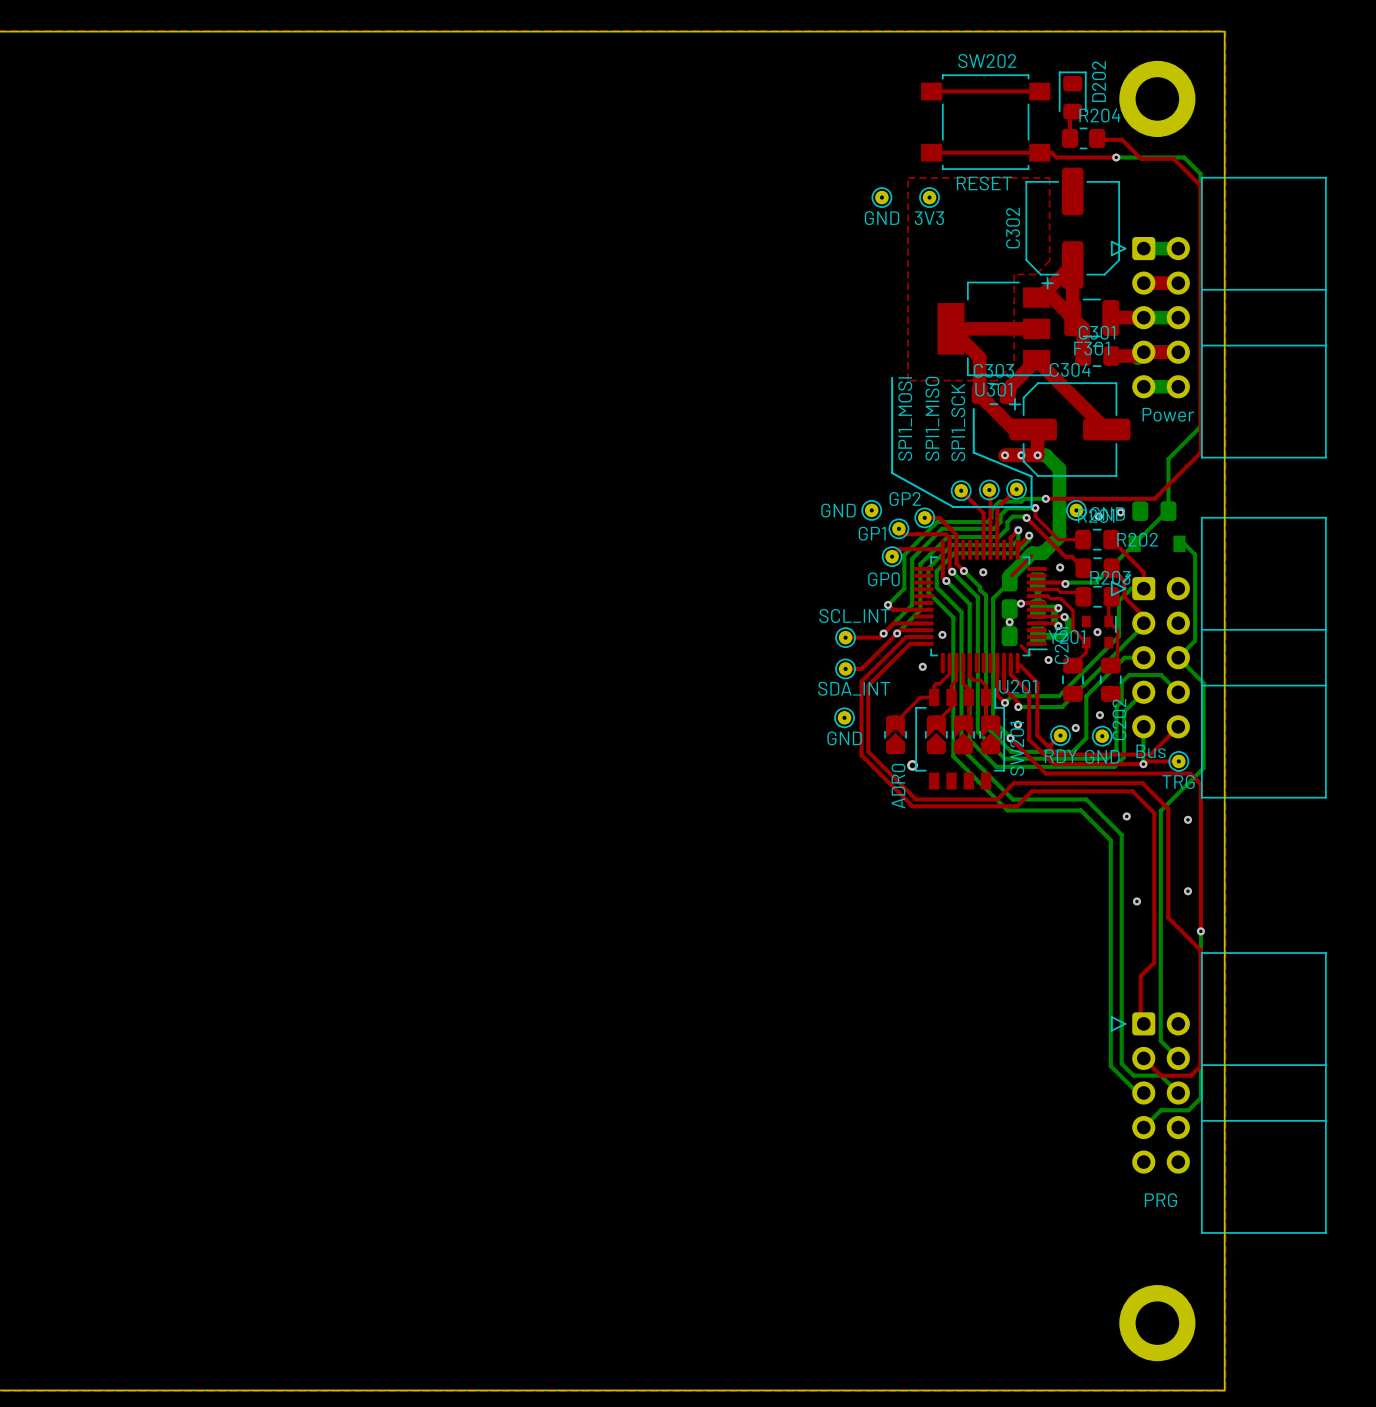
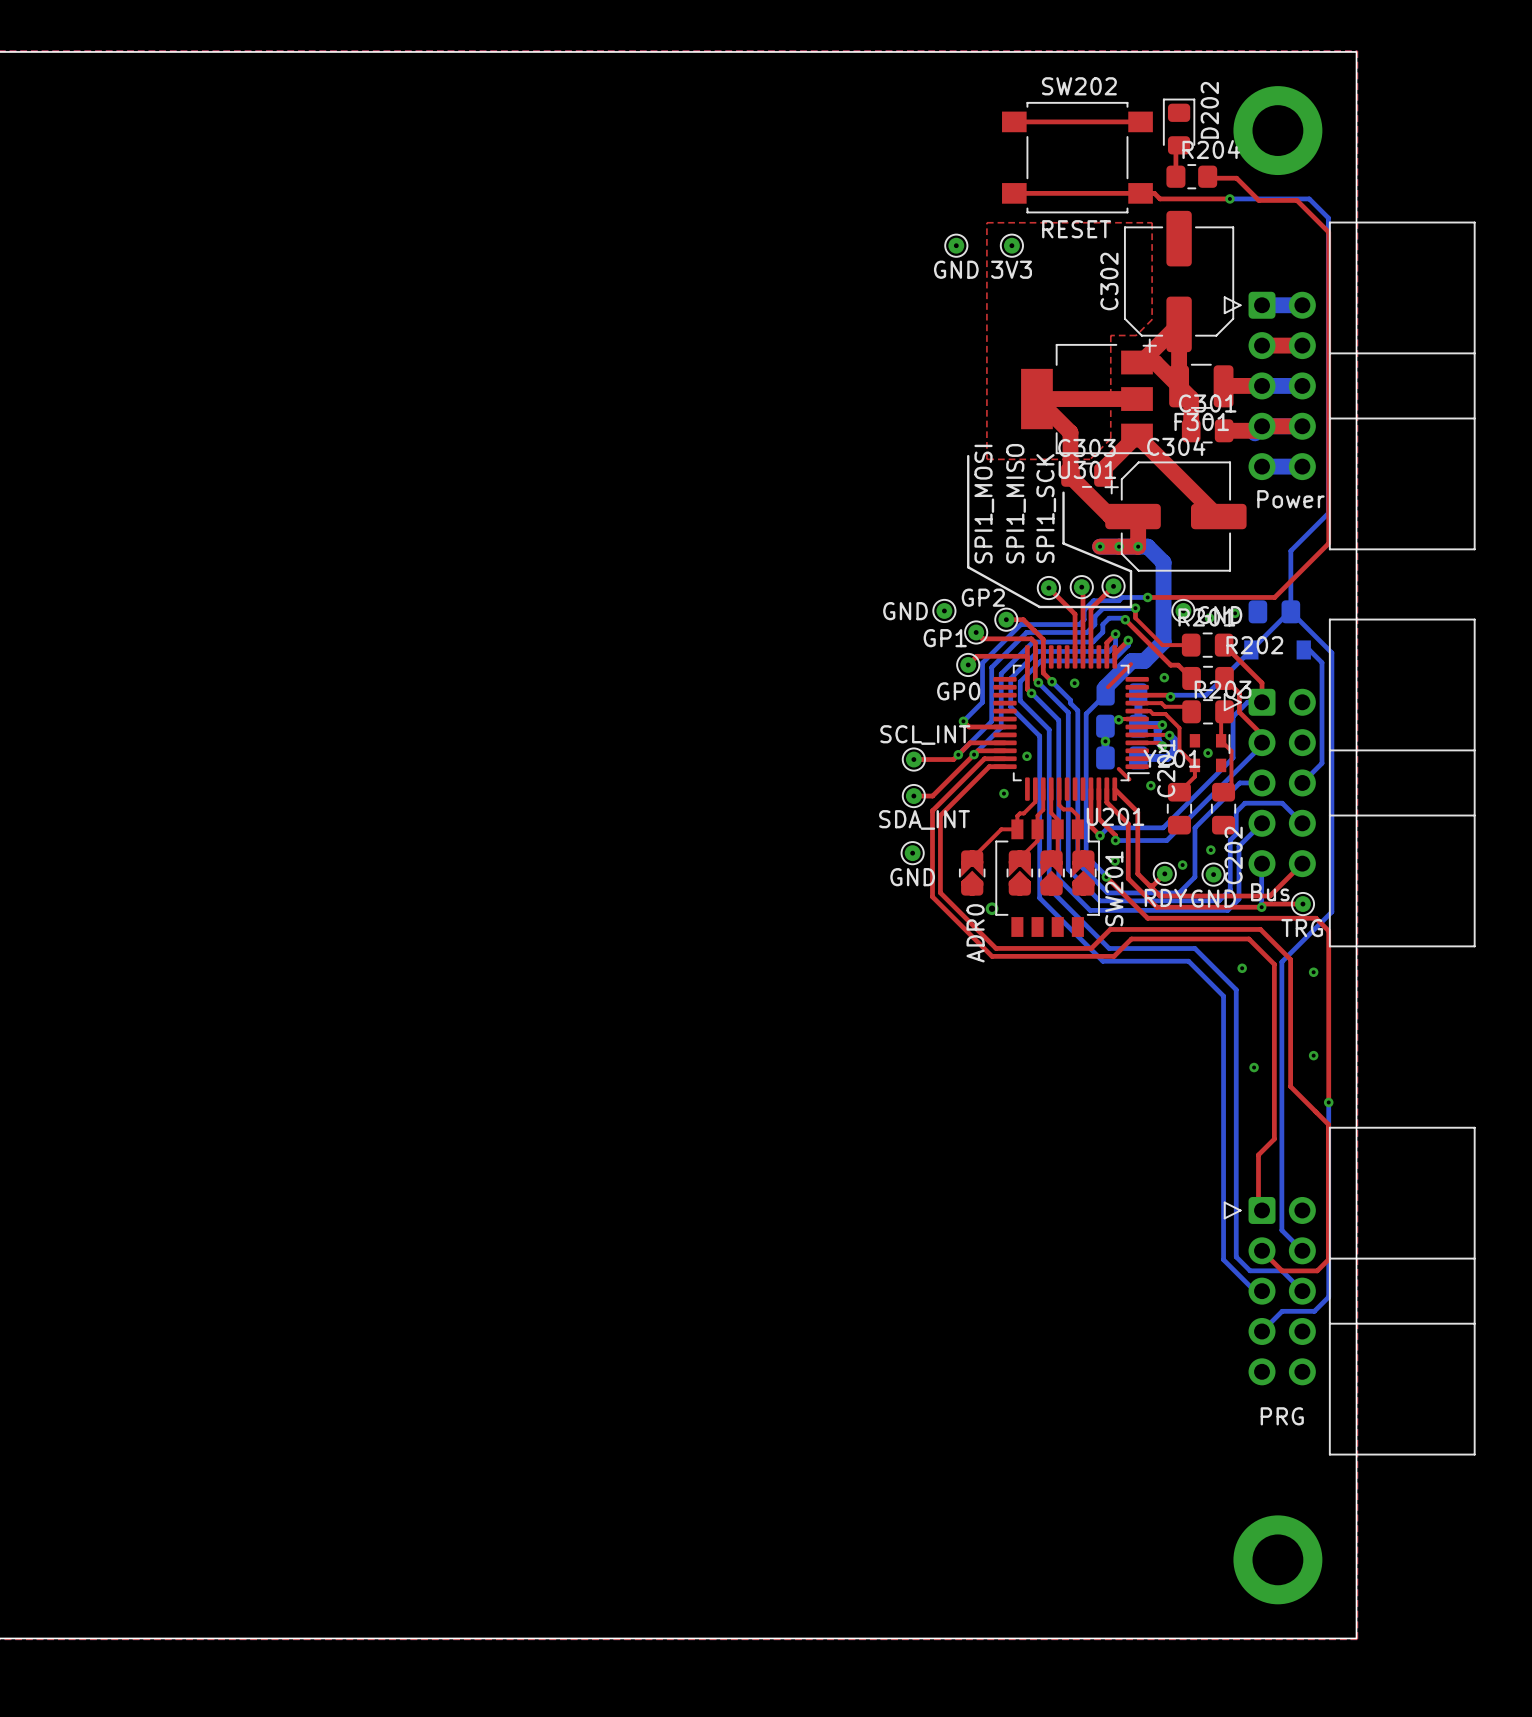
bottom track: (1178, 657) (1203, 683) -> (1290, 611) (1331, 652) (1331, 812)

